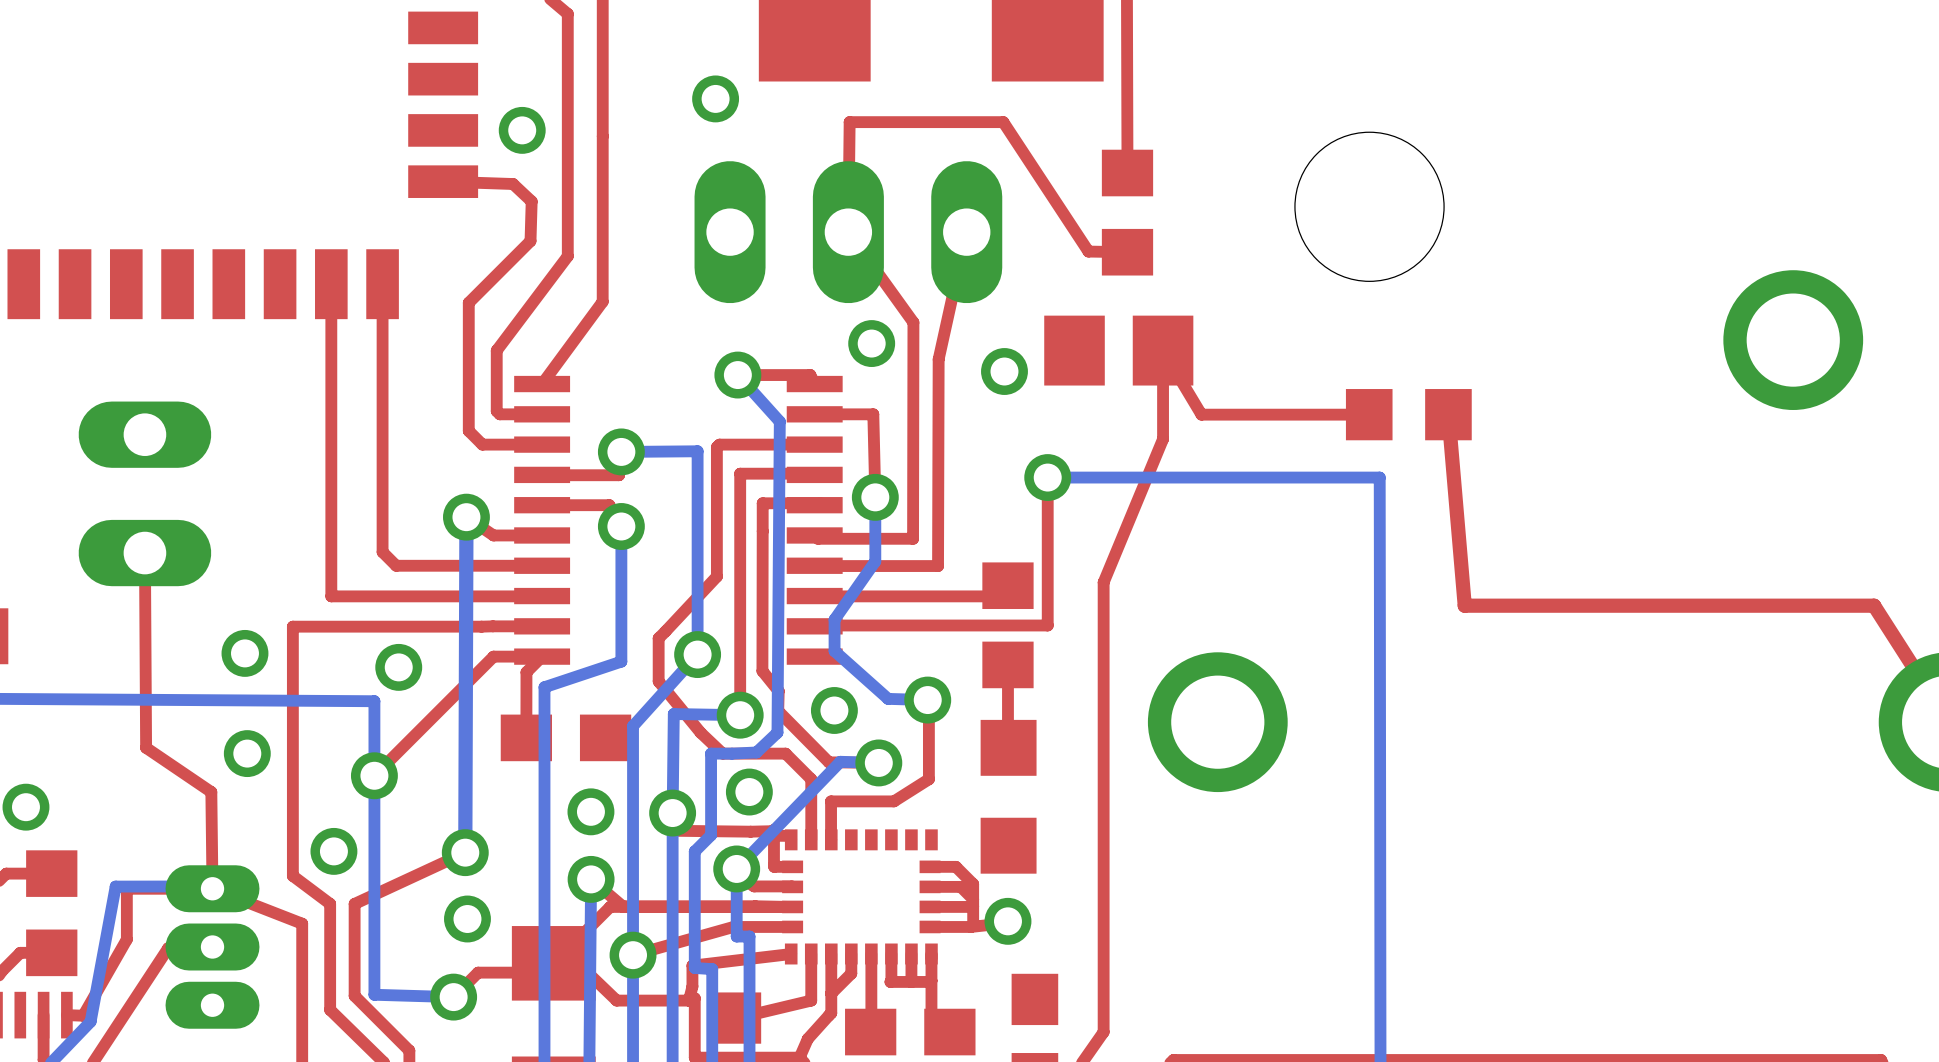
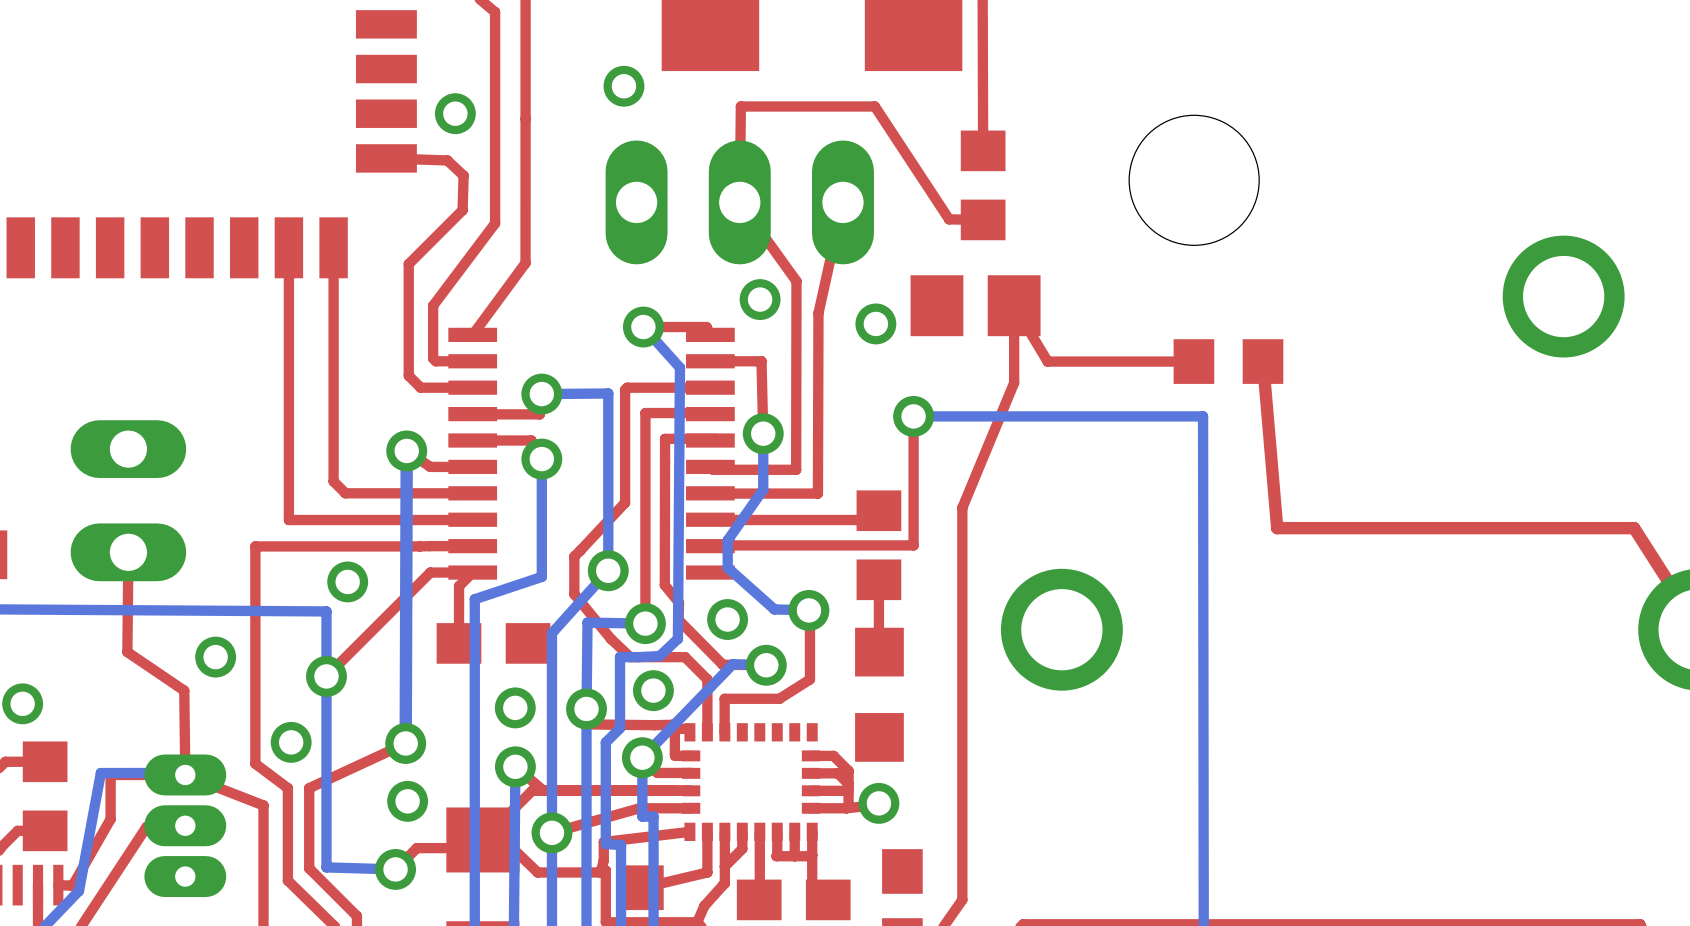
part position: (144, 493) -> (128, 500)
top track: (144, 553) (146, 747) -> (128, 552) (127, 652)
via: (244, 653) -> none

